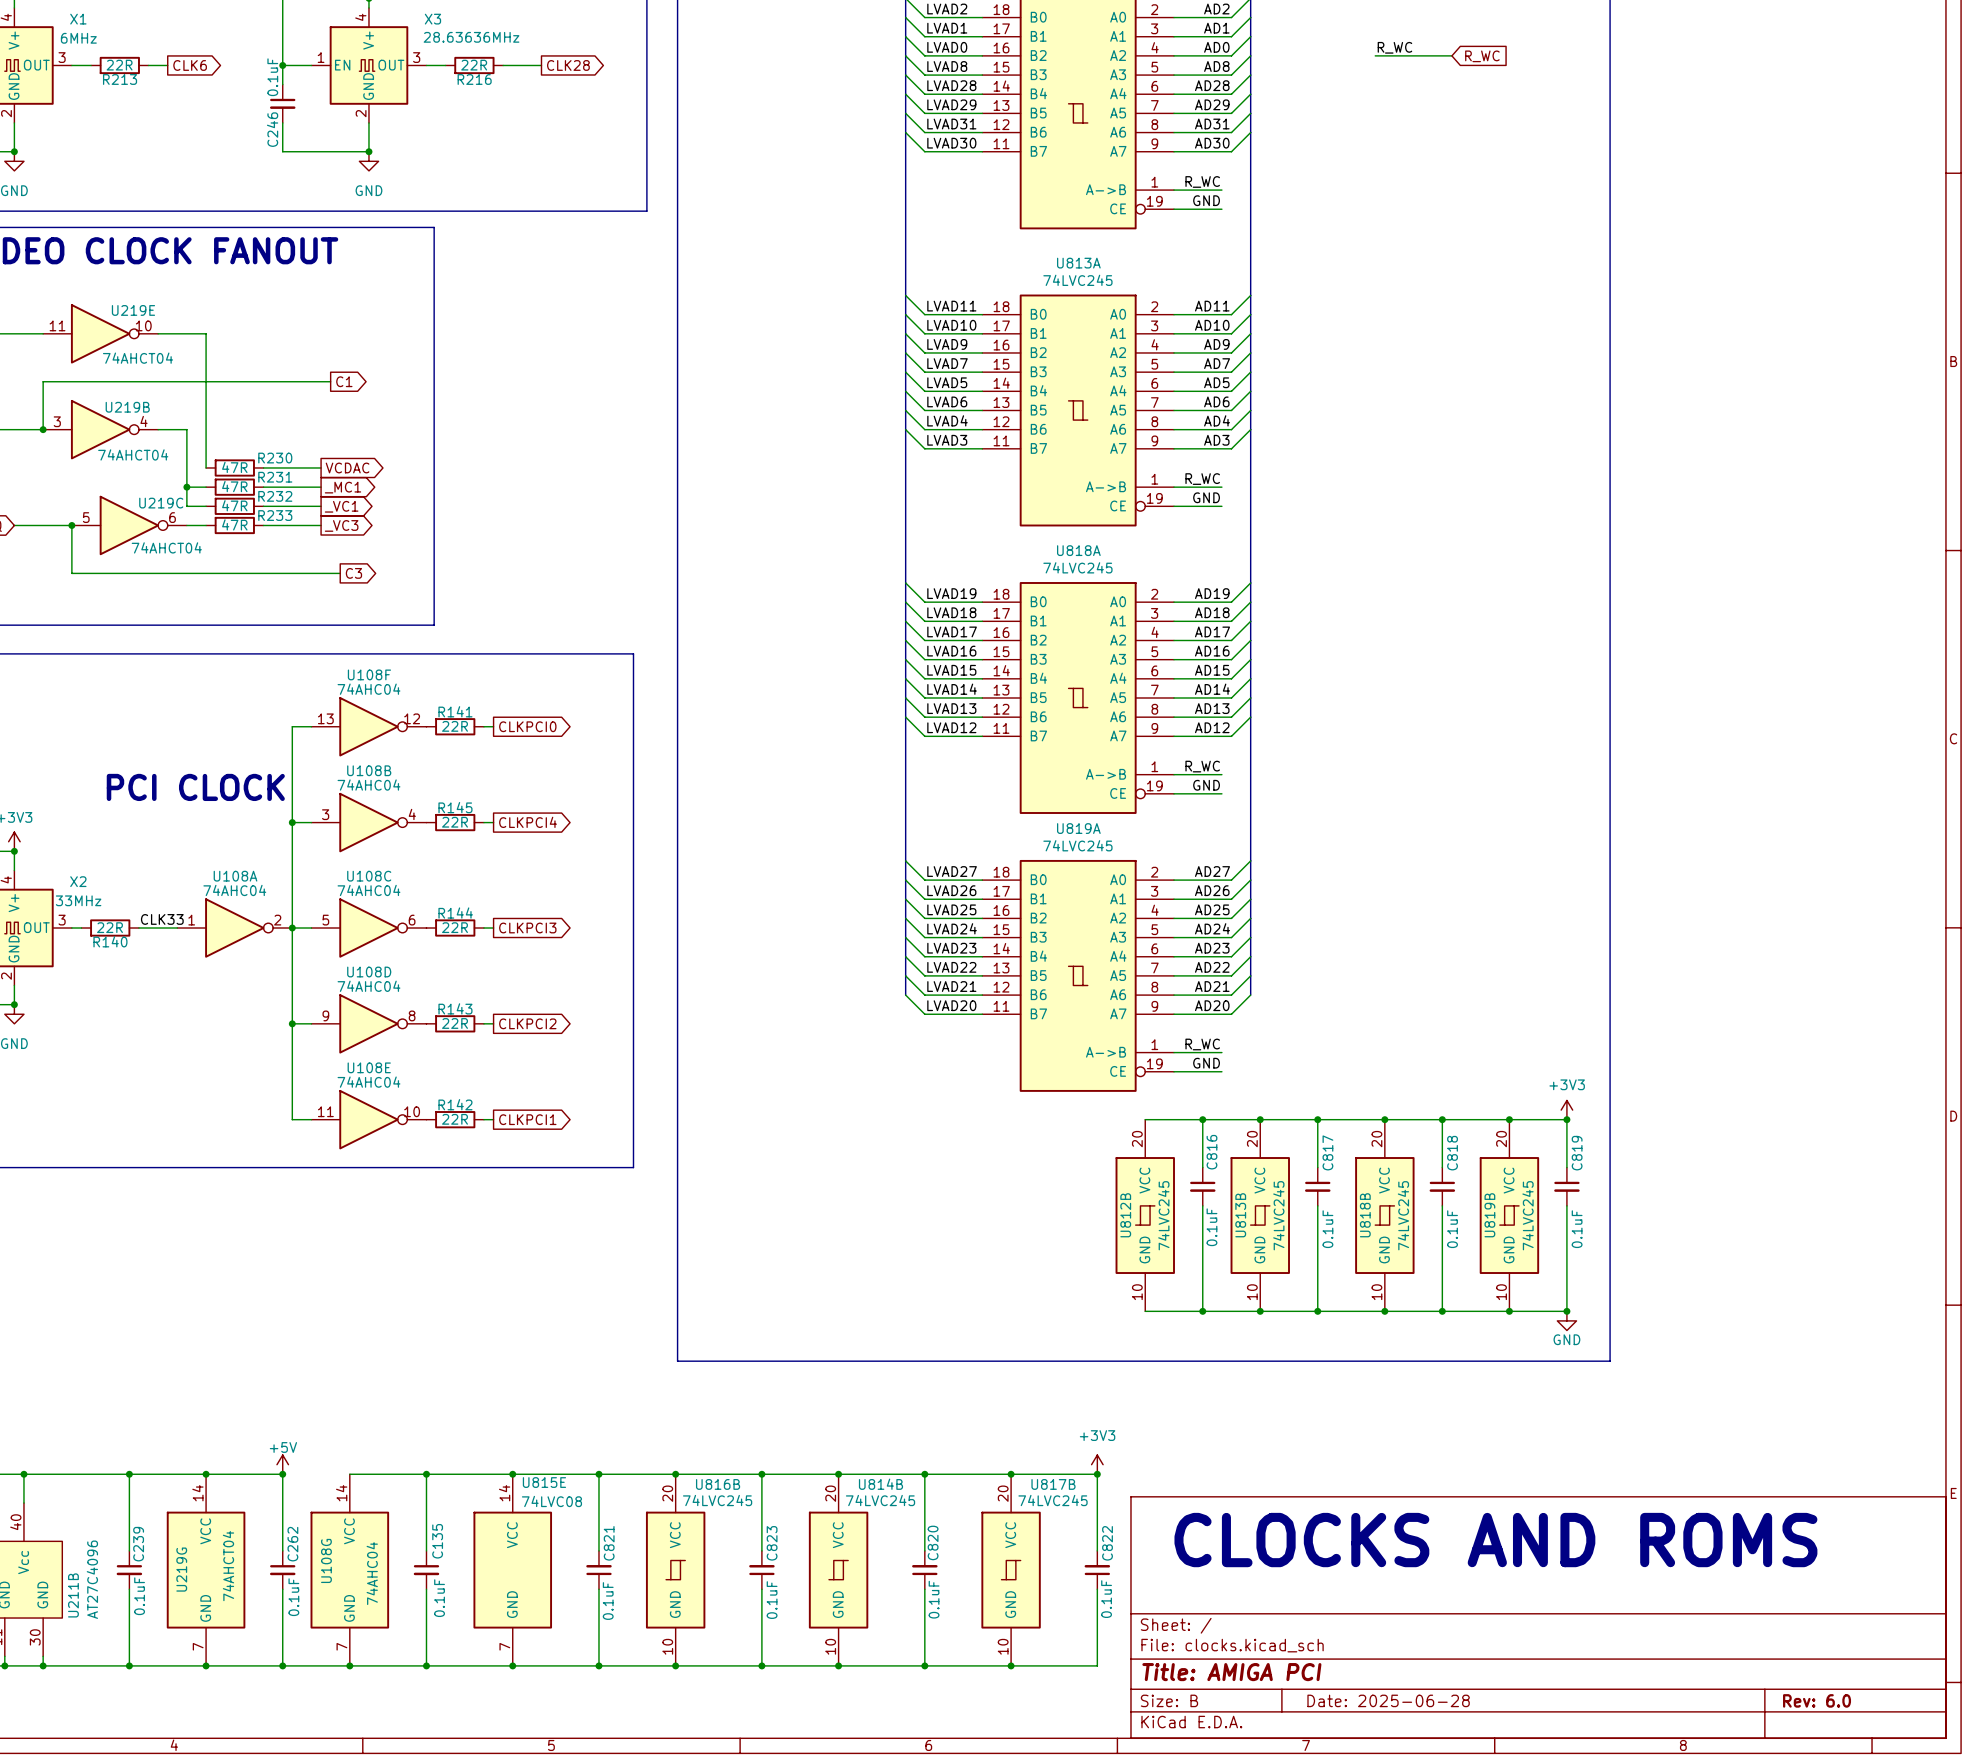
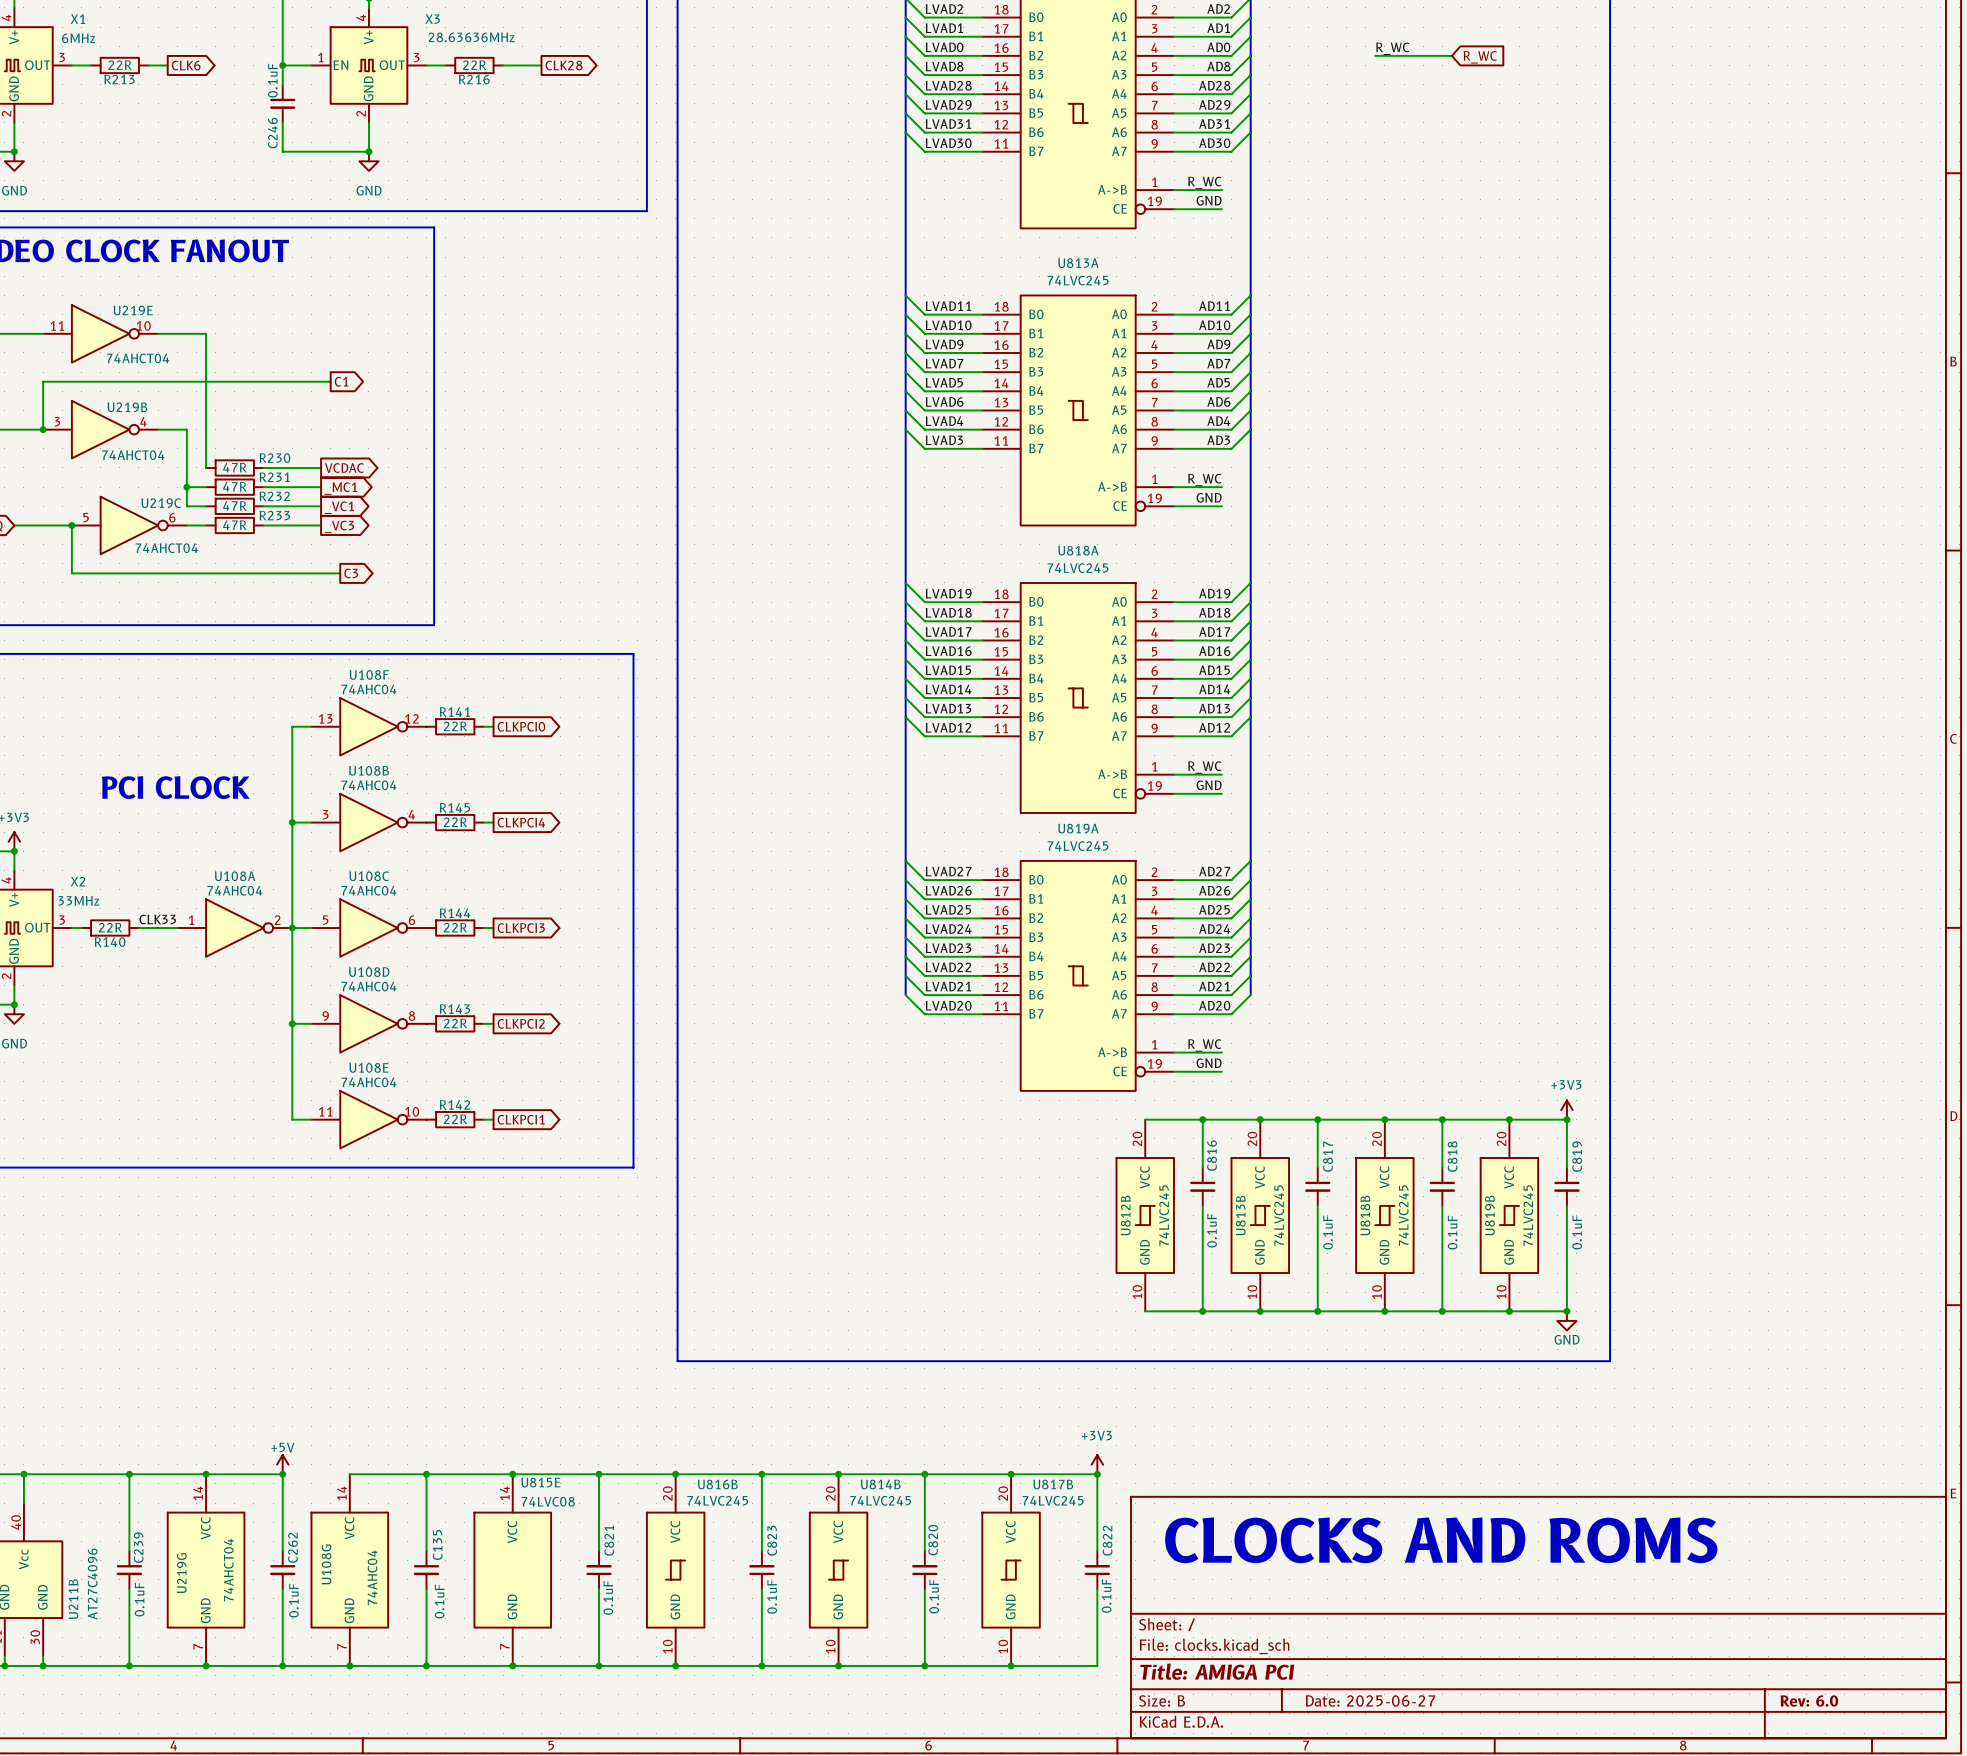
title block: Date: 2025-06-28 (1388, 1700) -> Date: 2025-06-27 (1370, 1700)

